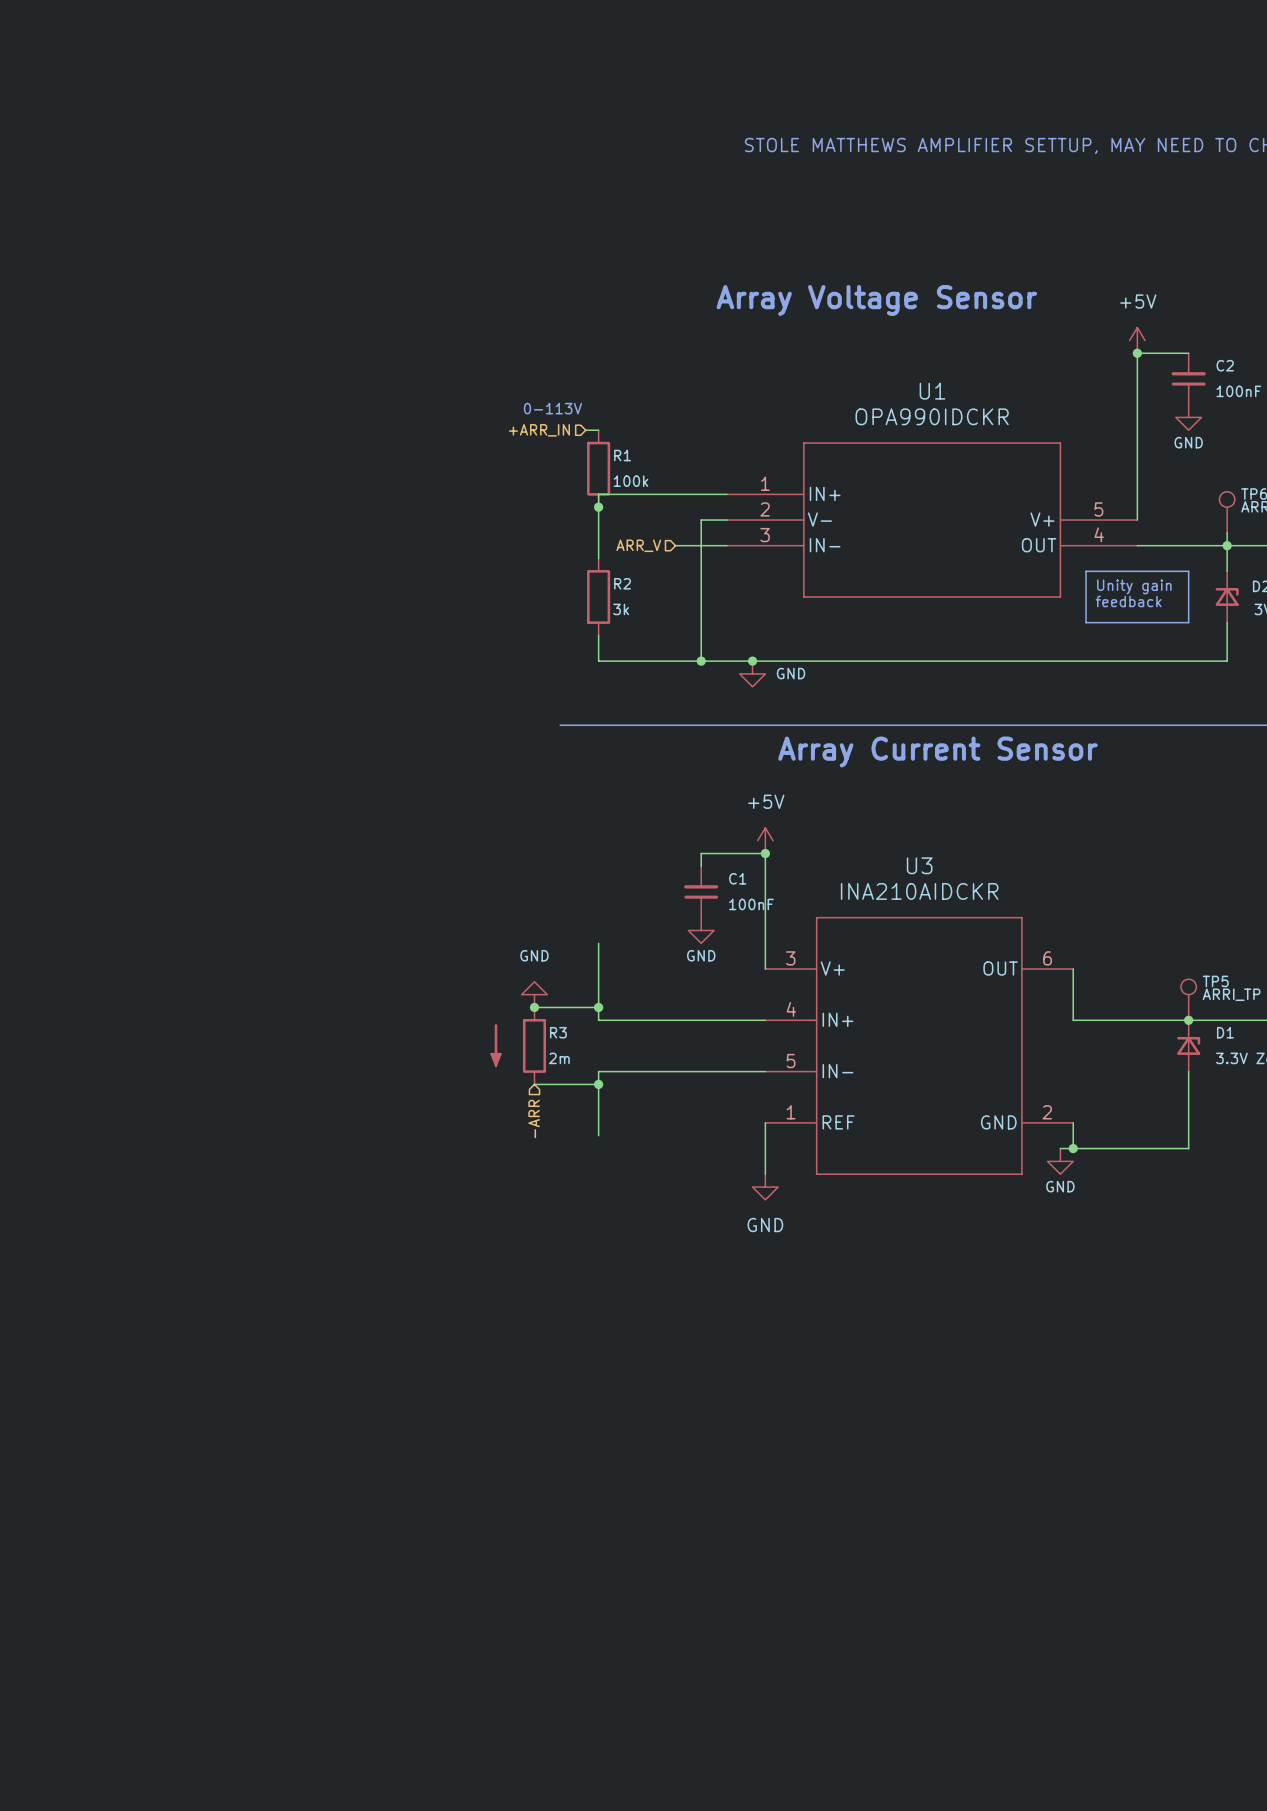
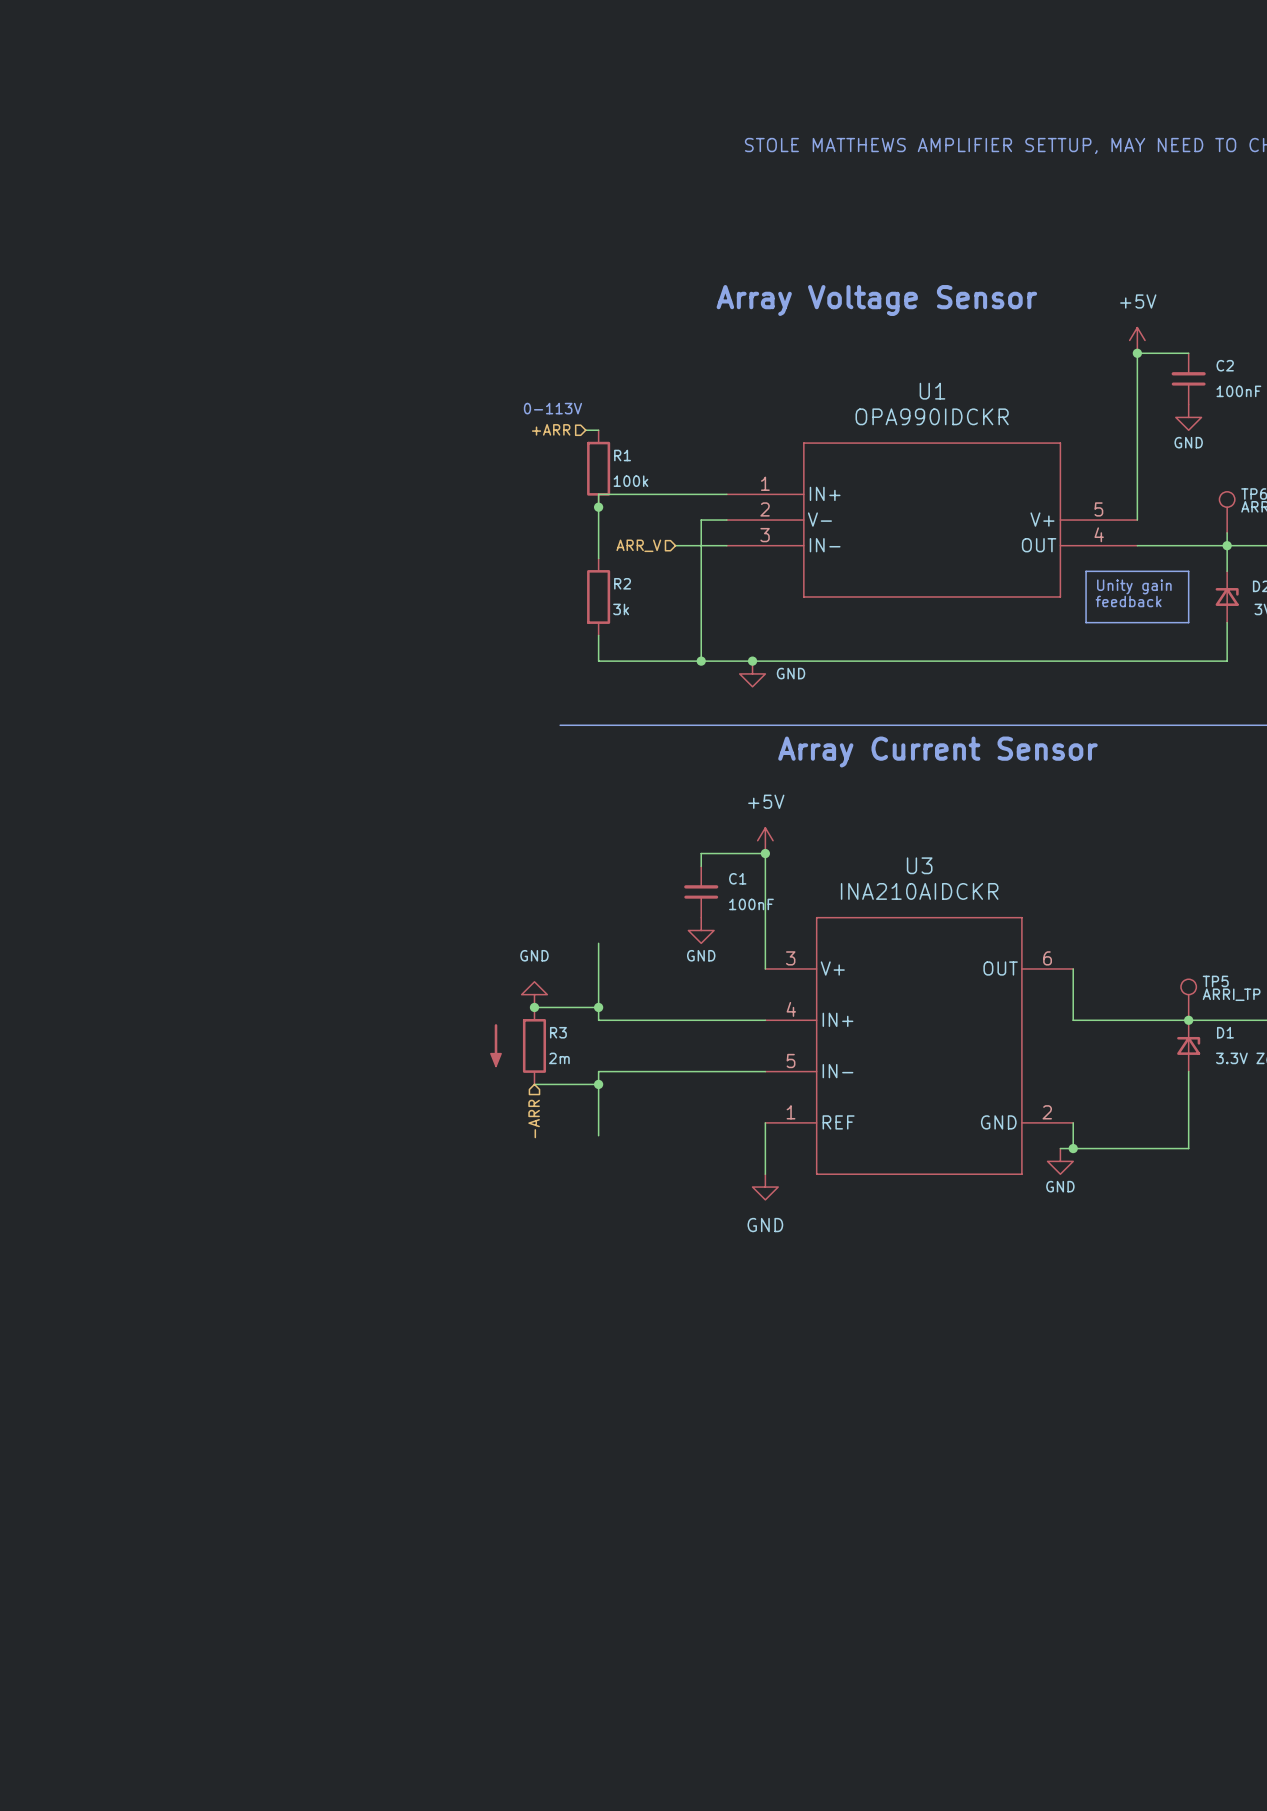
hierarchical label: +ARR_IN (539, 430) -> +ARR (551, 429)

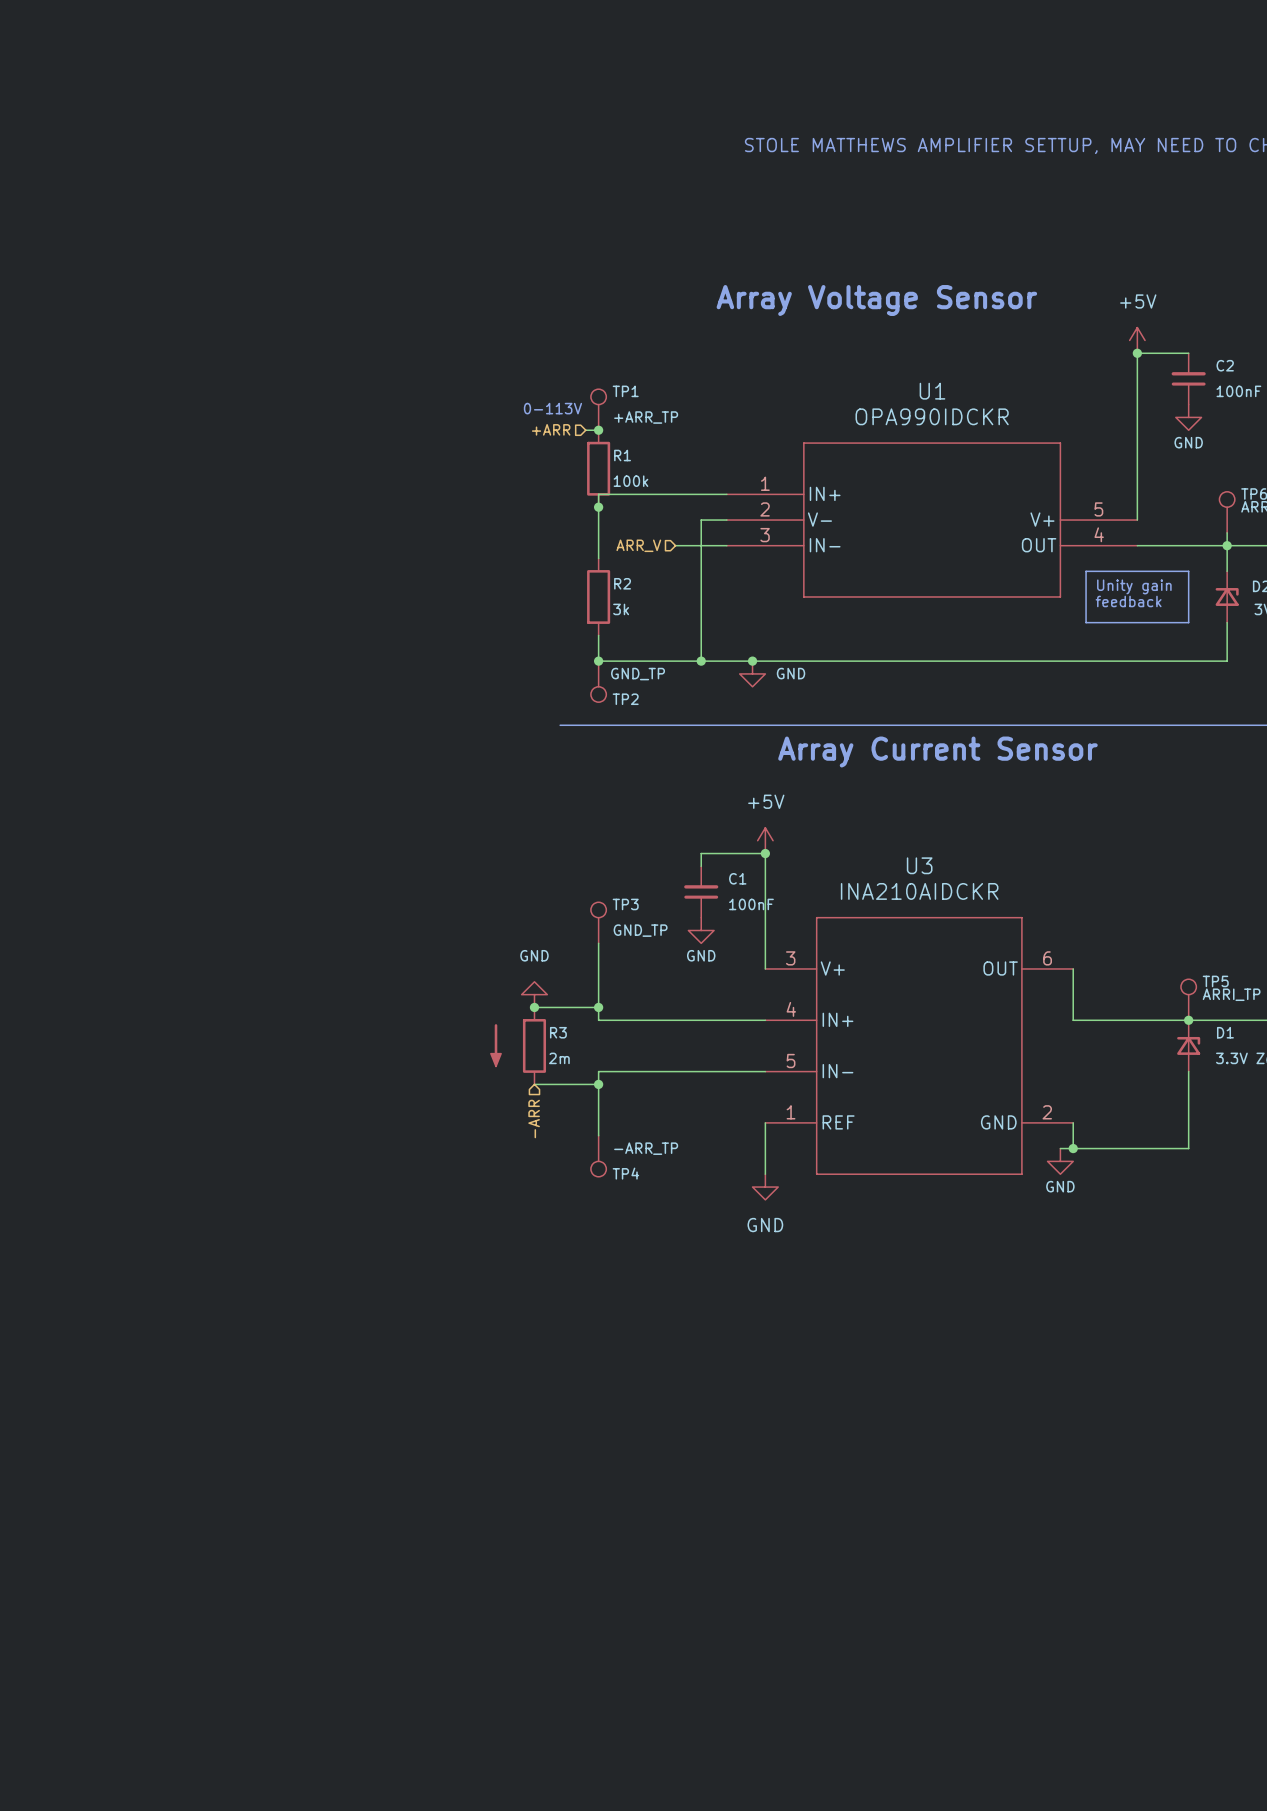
TP1: none -> +ARR_TP (598, 409)
junction: none -> (598, 430)
junction: none -> (598, 661)
TP2: none -> GND_TP (598, 681)
TP3: none -> GND_TP (598, 922)
TP4: none -> -ARR_TP (598, 1156)

